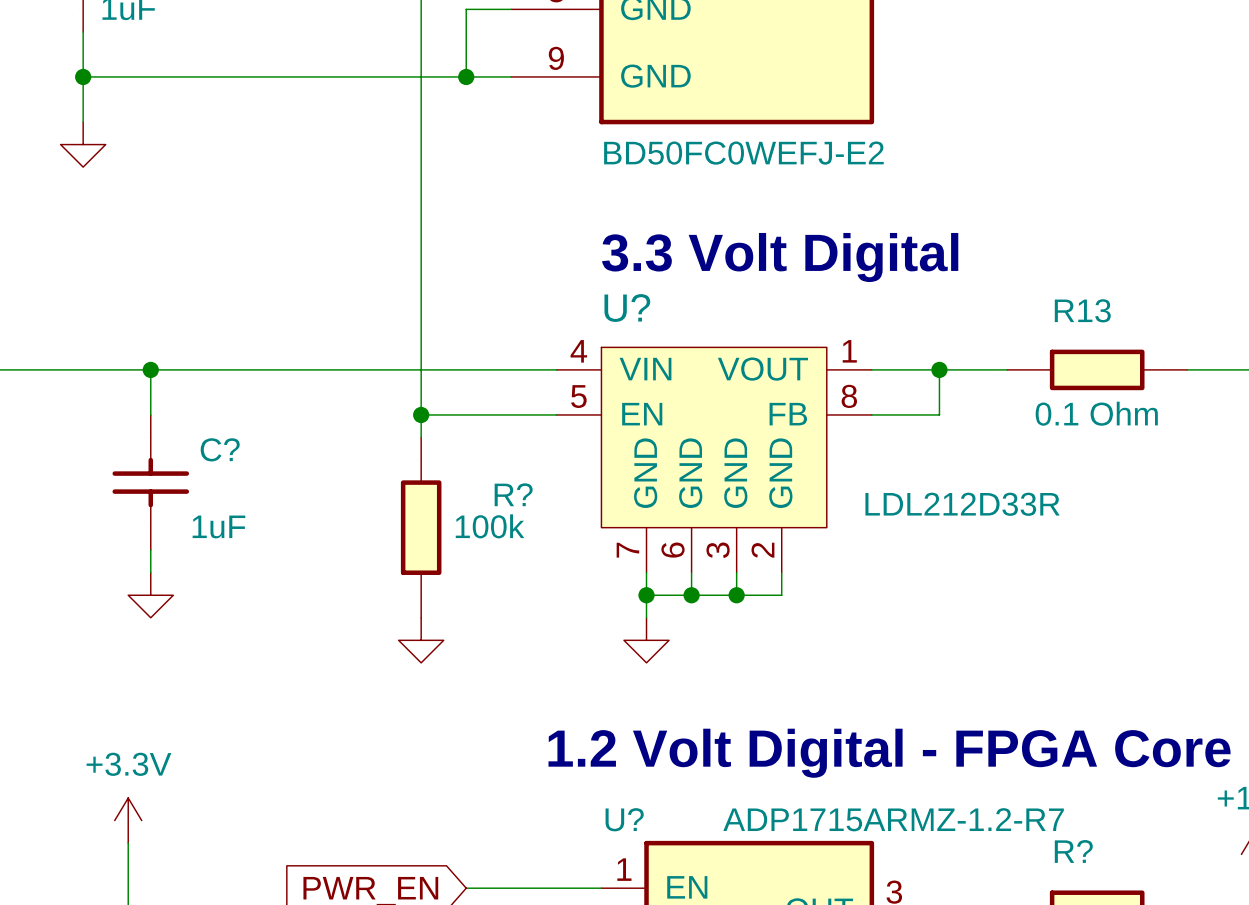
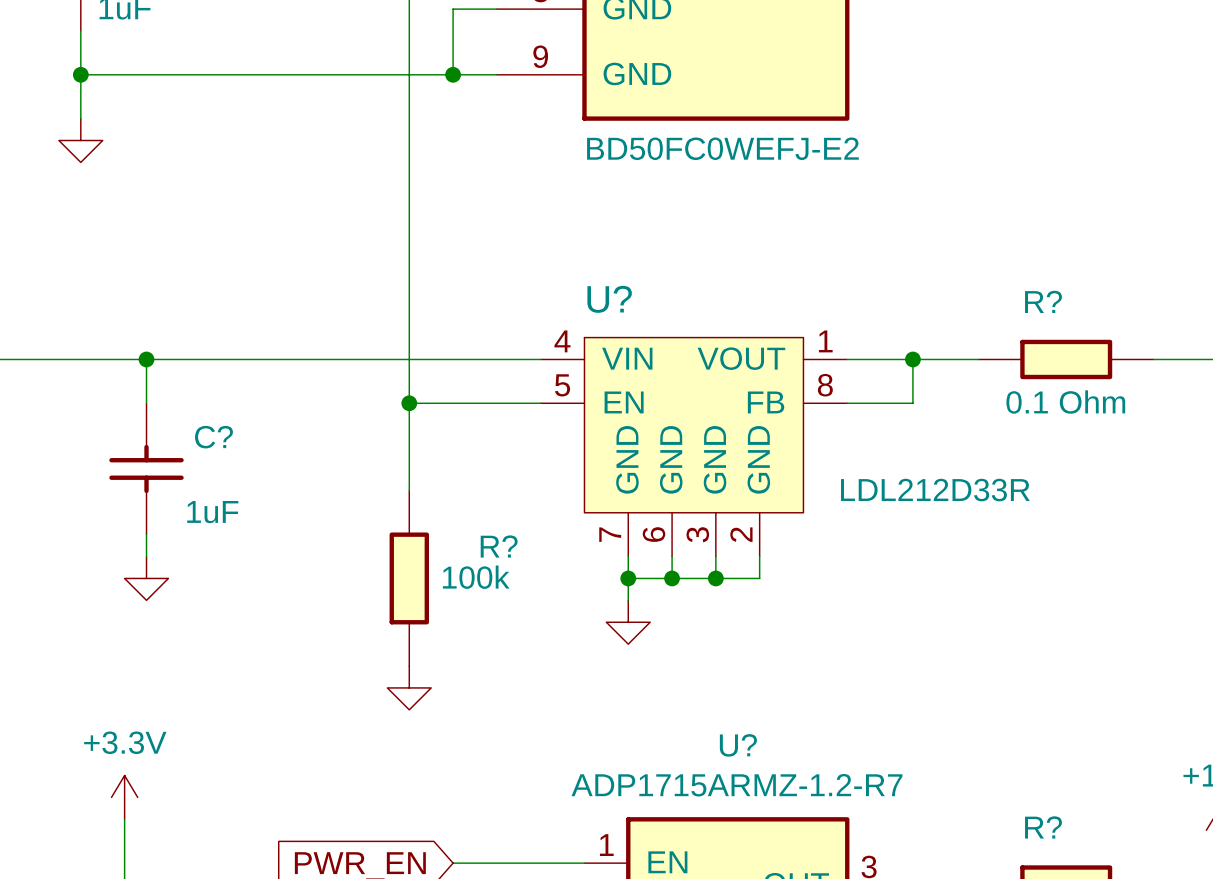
text: 3.3 Volt Digital (780, 257) -> none
R13 name: R13 (1082, 310) -> R? (1043, 301)
R? position: (421, 527) -> (409, 578)
power symbol position: (421, 640) -> (409, 687)
text: 1.2 Volt Digital - FPGA Core (889, 753) -> none
U? name position: U? (624, 819) -> U? (738, 745)
U? value position: ADP1715ARMZ-1.2-R7 (893, 819) -> ADP1715ARMZ-1.2-R7 (736, 785)

